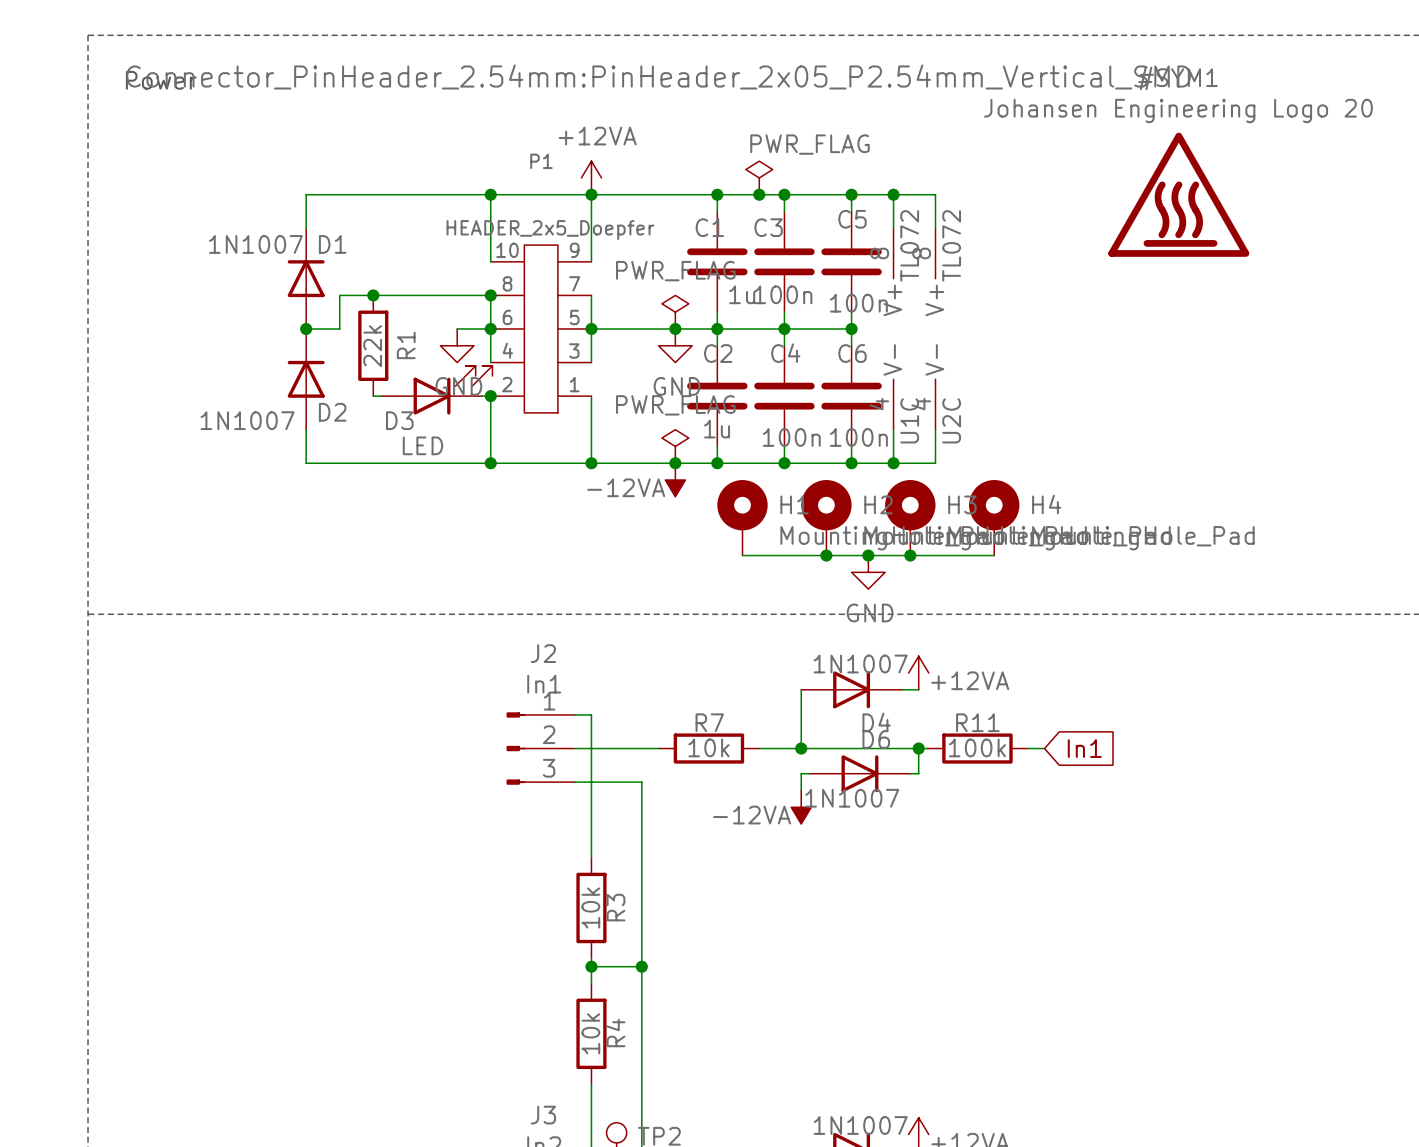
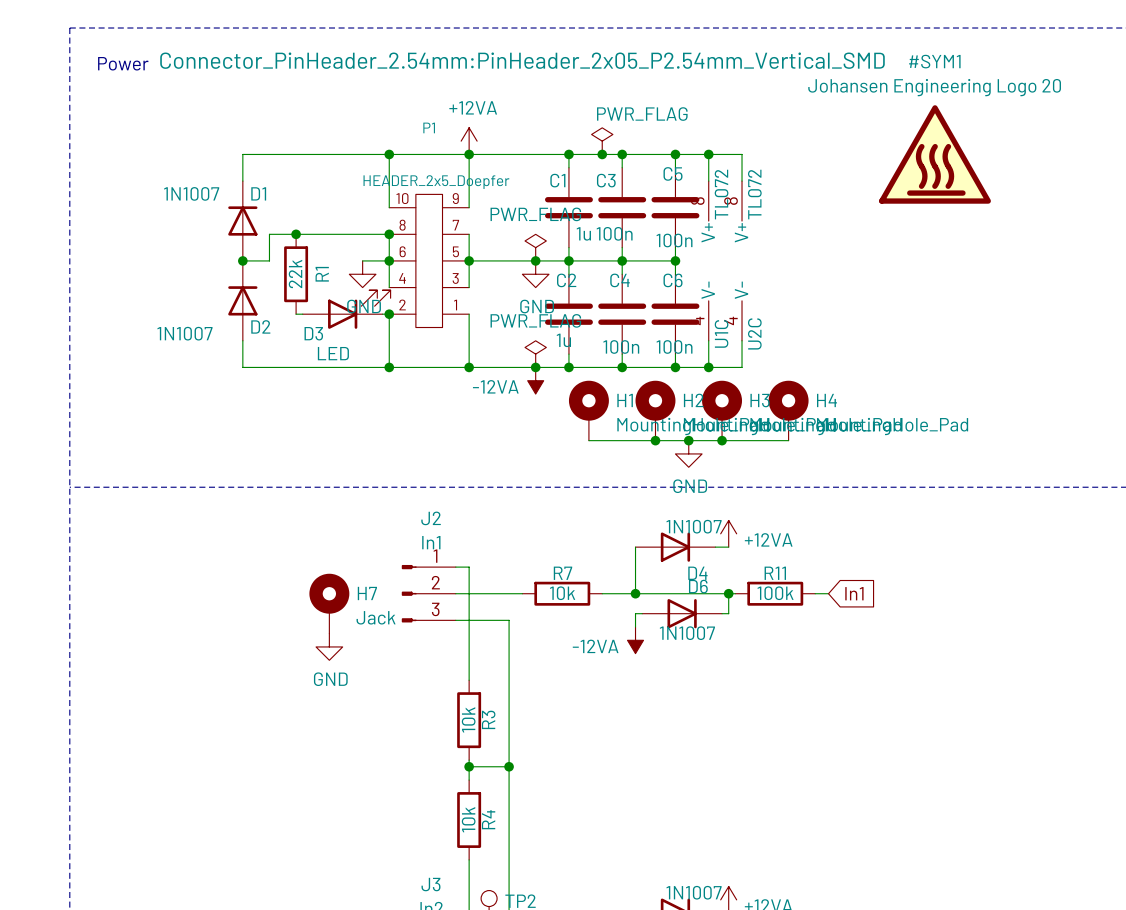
H7: none -> Jack (329, 603)
power symbol: none -> GND (329, 646)

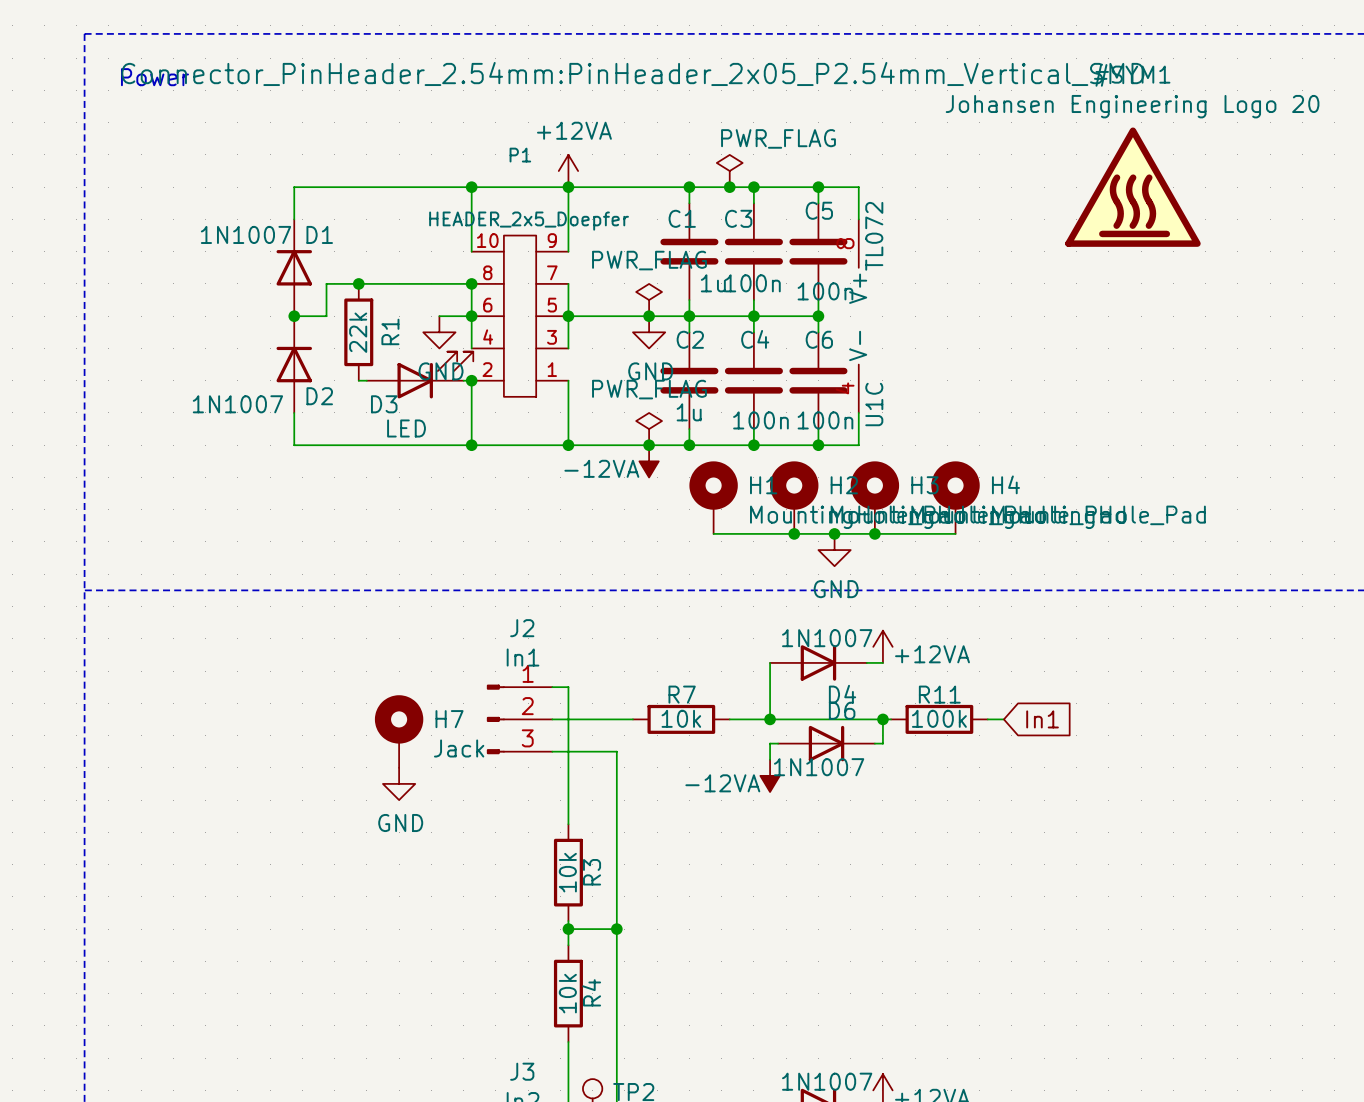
wire: (708, 154) (742, 154) (742, 181) -> none
junction: (708, 154) -> none
U2C: TL072 (742, 260) -> none
wire: (742, 340) (742, 367) (708, 367) -> none
junction: (708, 367) -> none

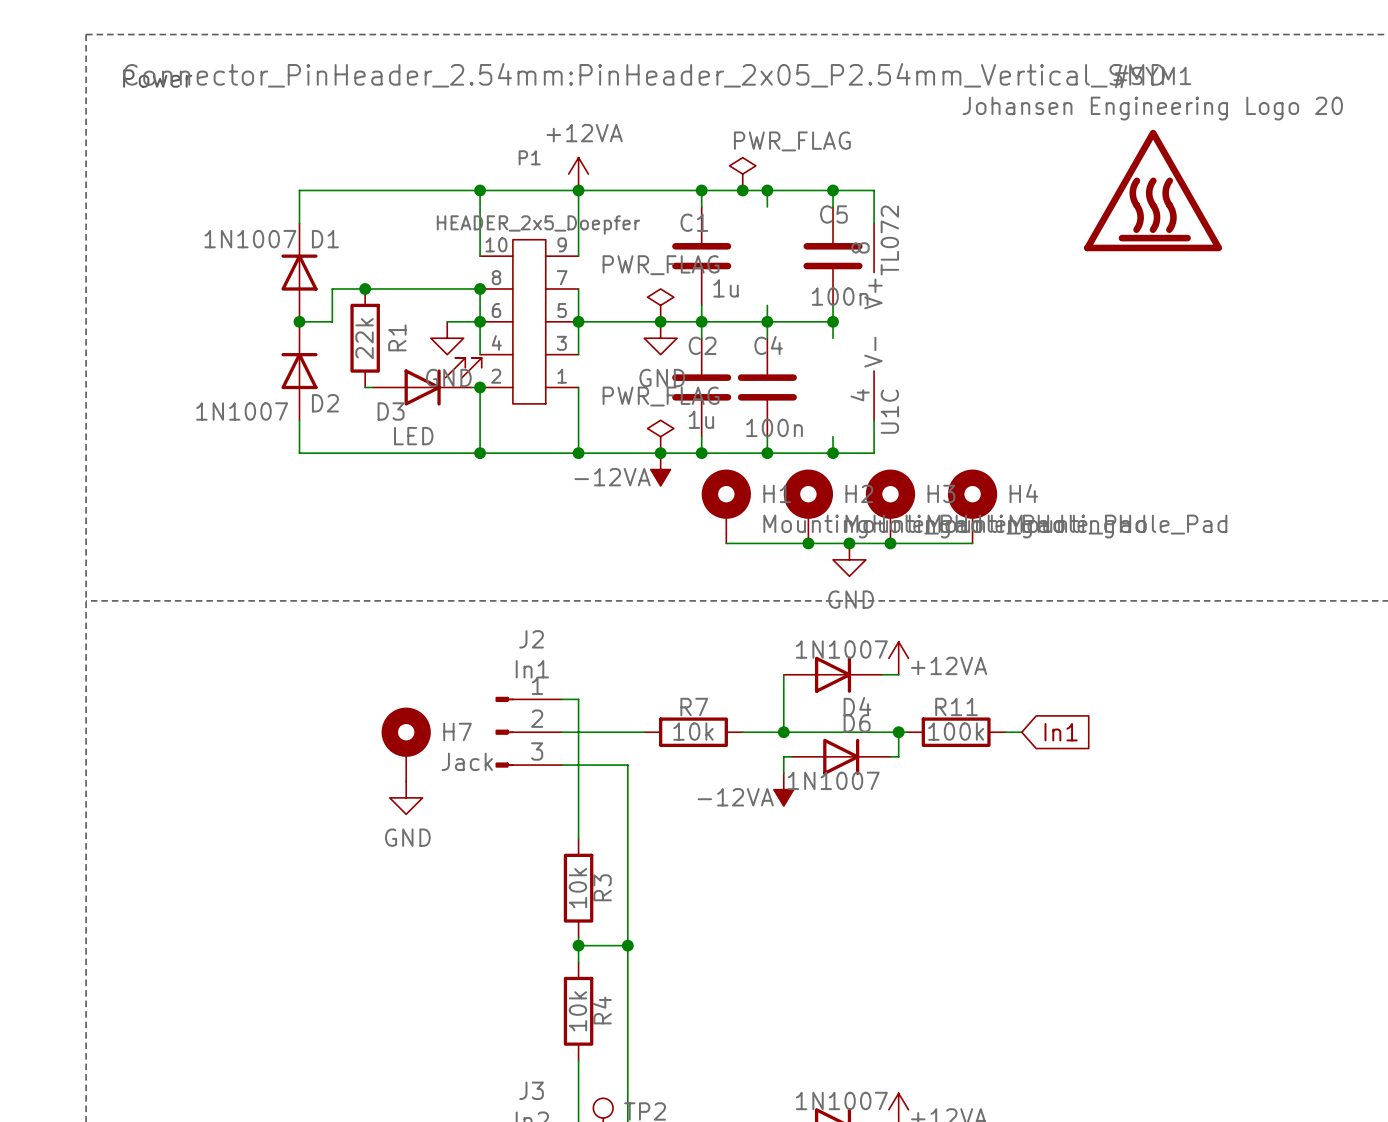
C3: 100n (753, 251) -> none
C6: 100n (818, 380) -> none

